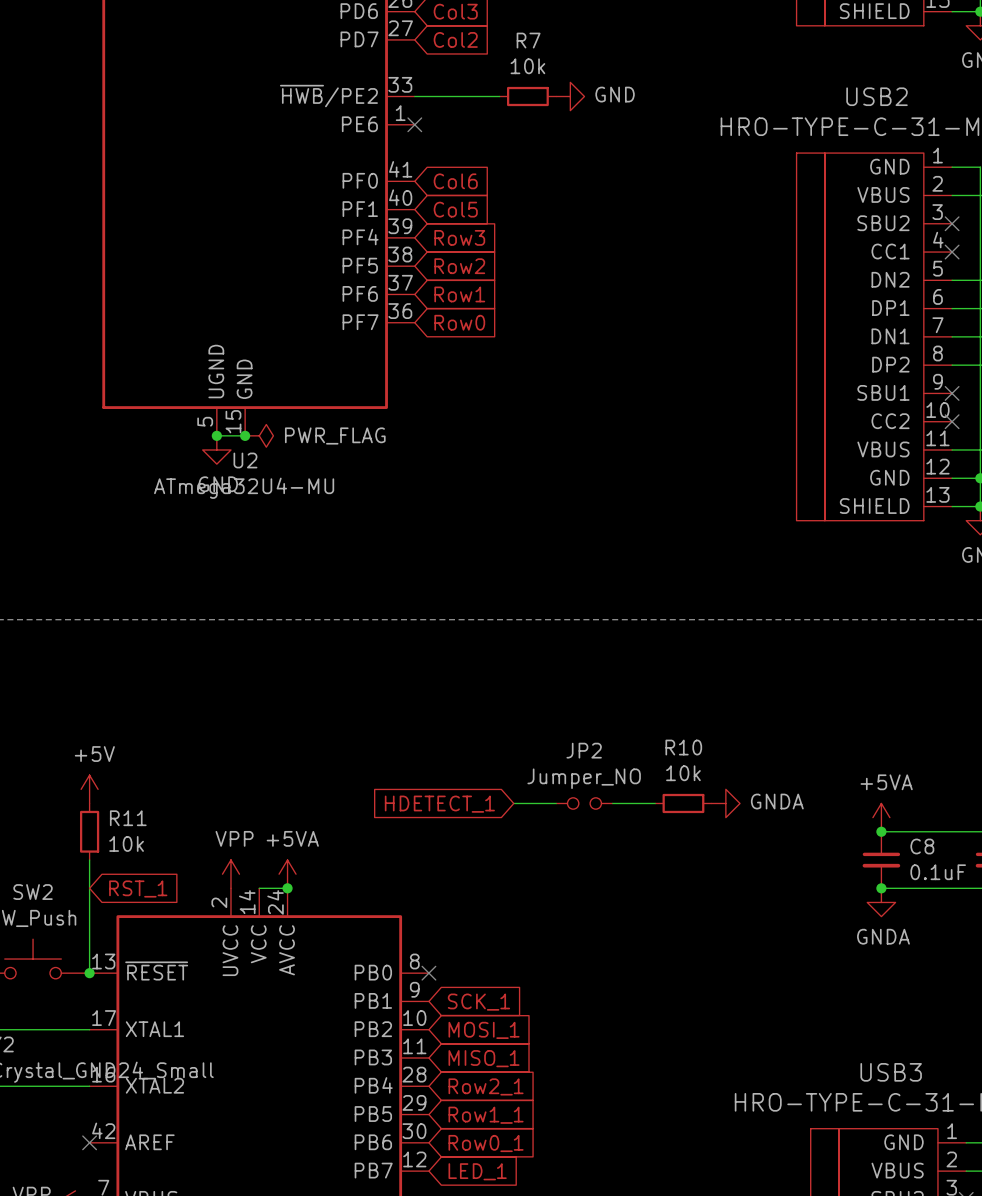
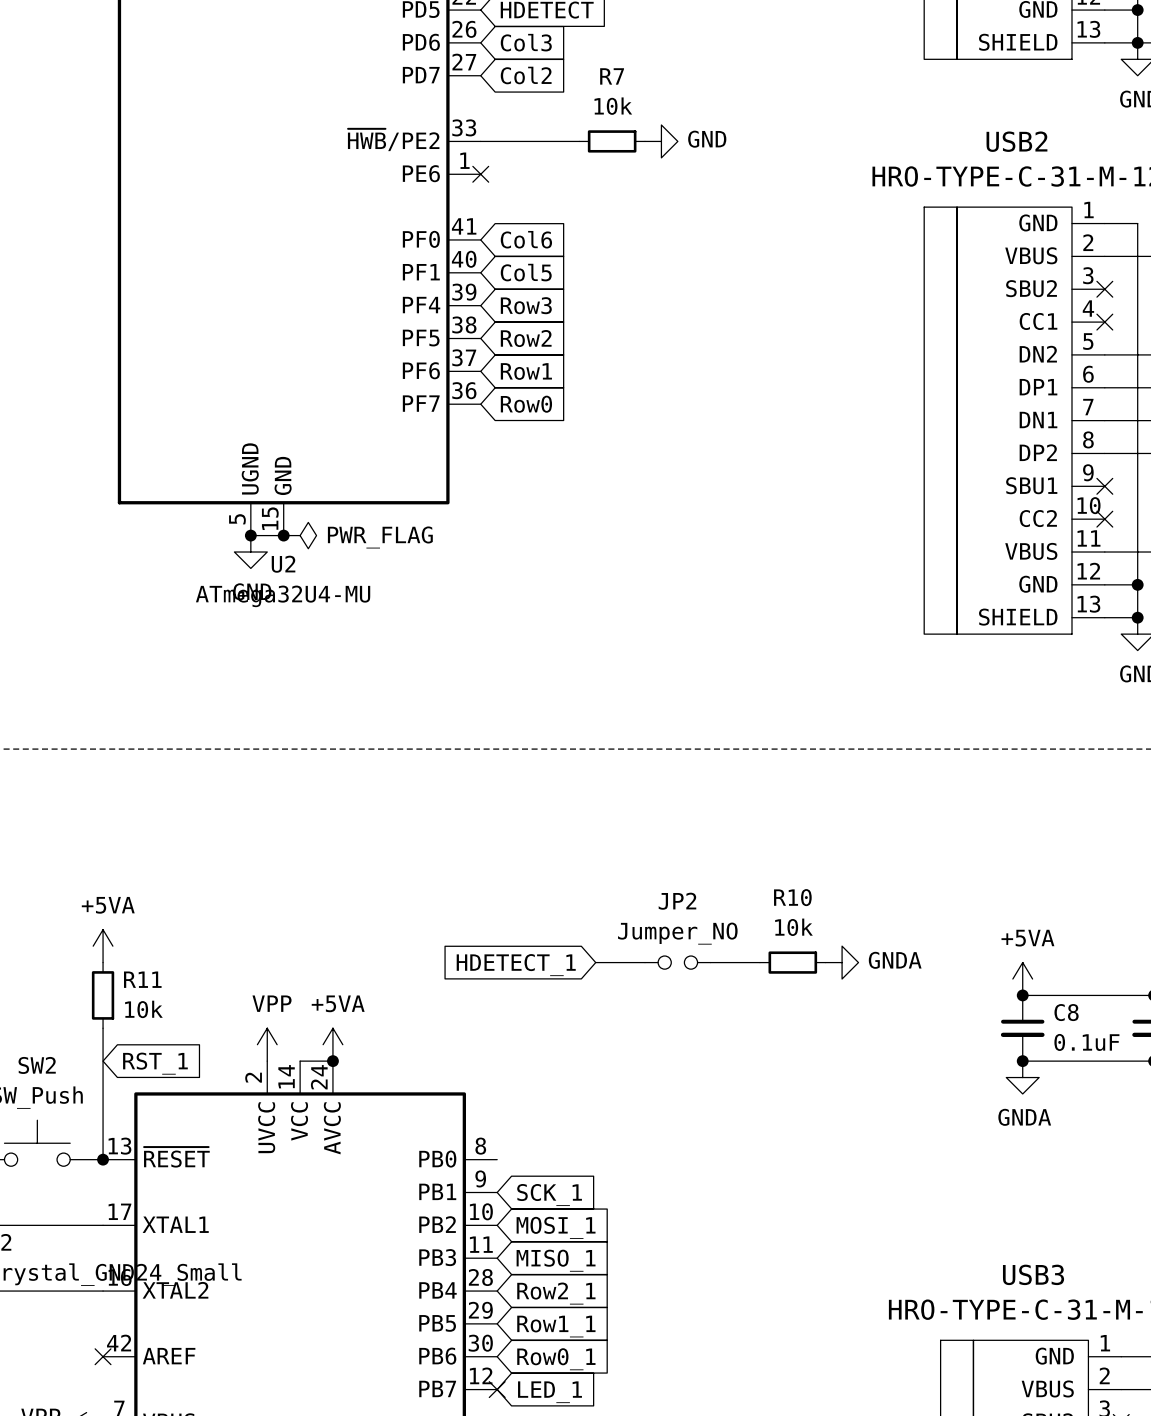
power symbol: +5V (89, 789) -> +5VA (103, 946)
no-connect mark: (428, 973) -> none
no-connect mark: none -> (497, 1389)

